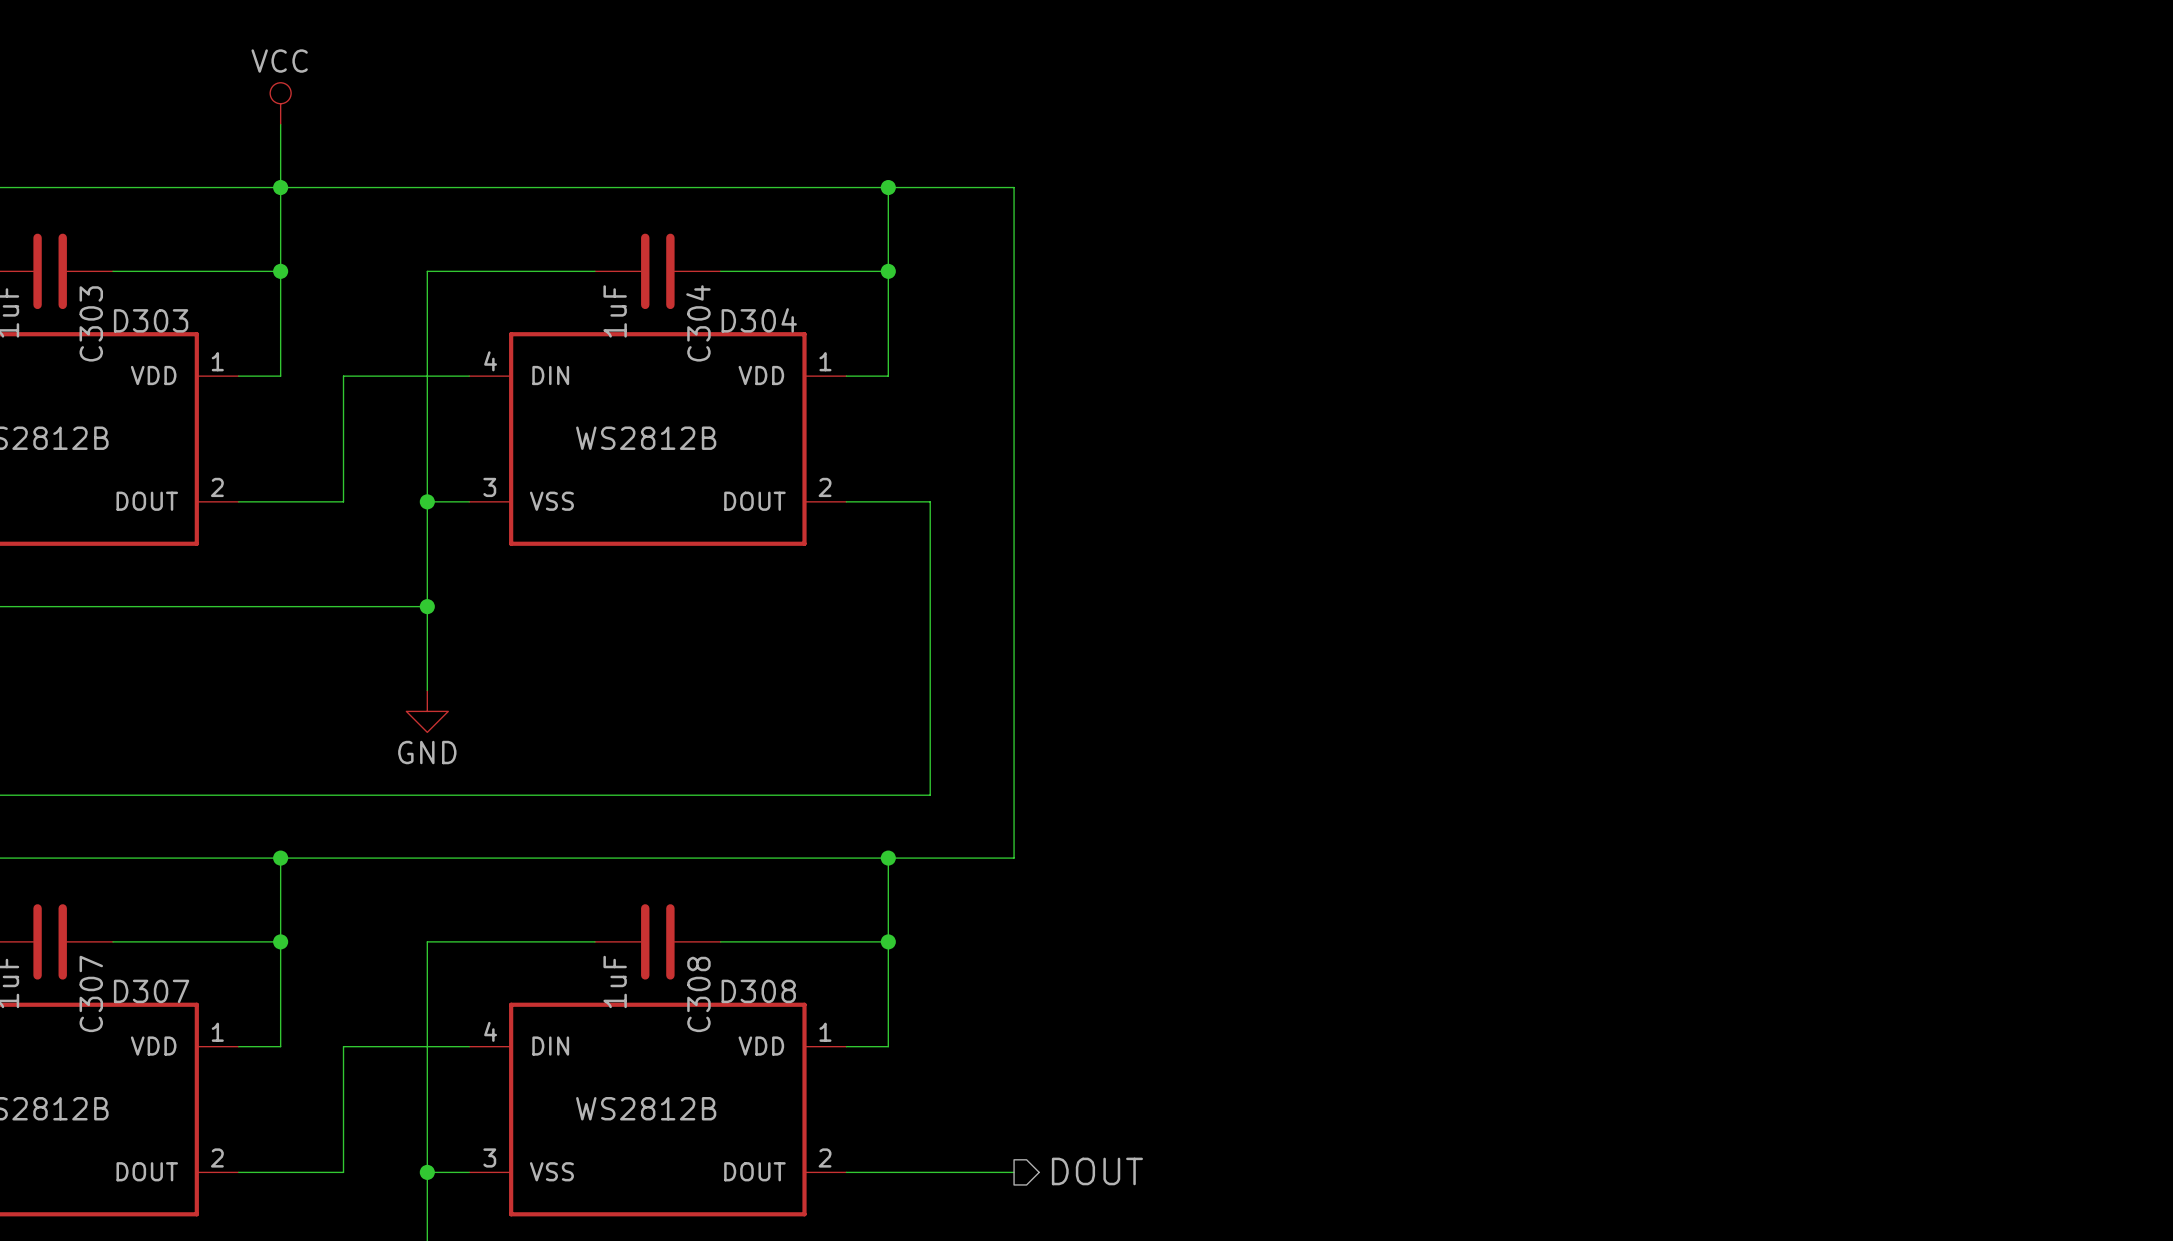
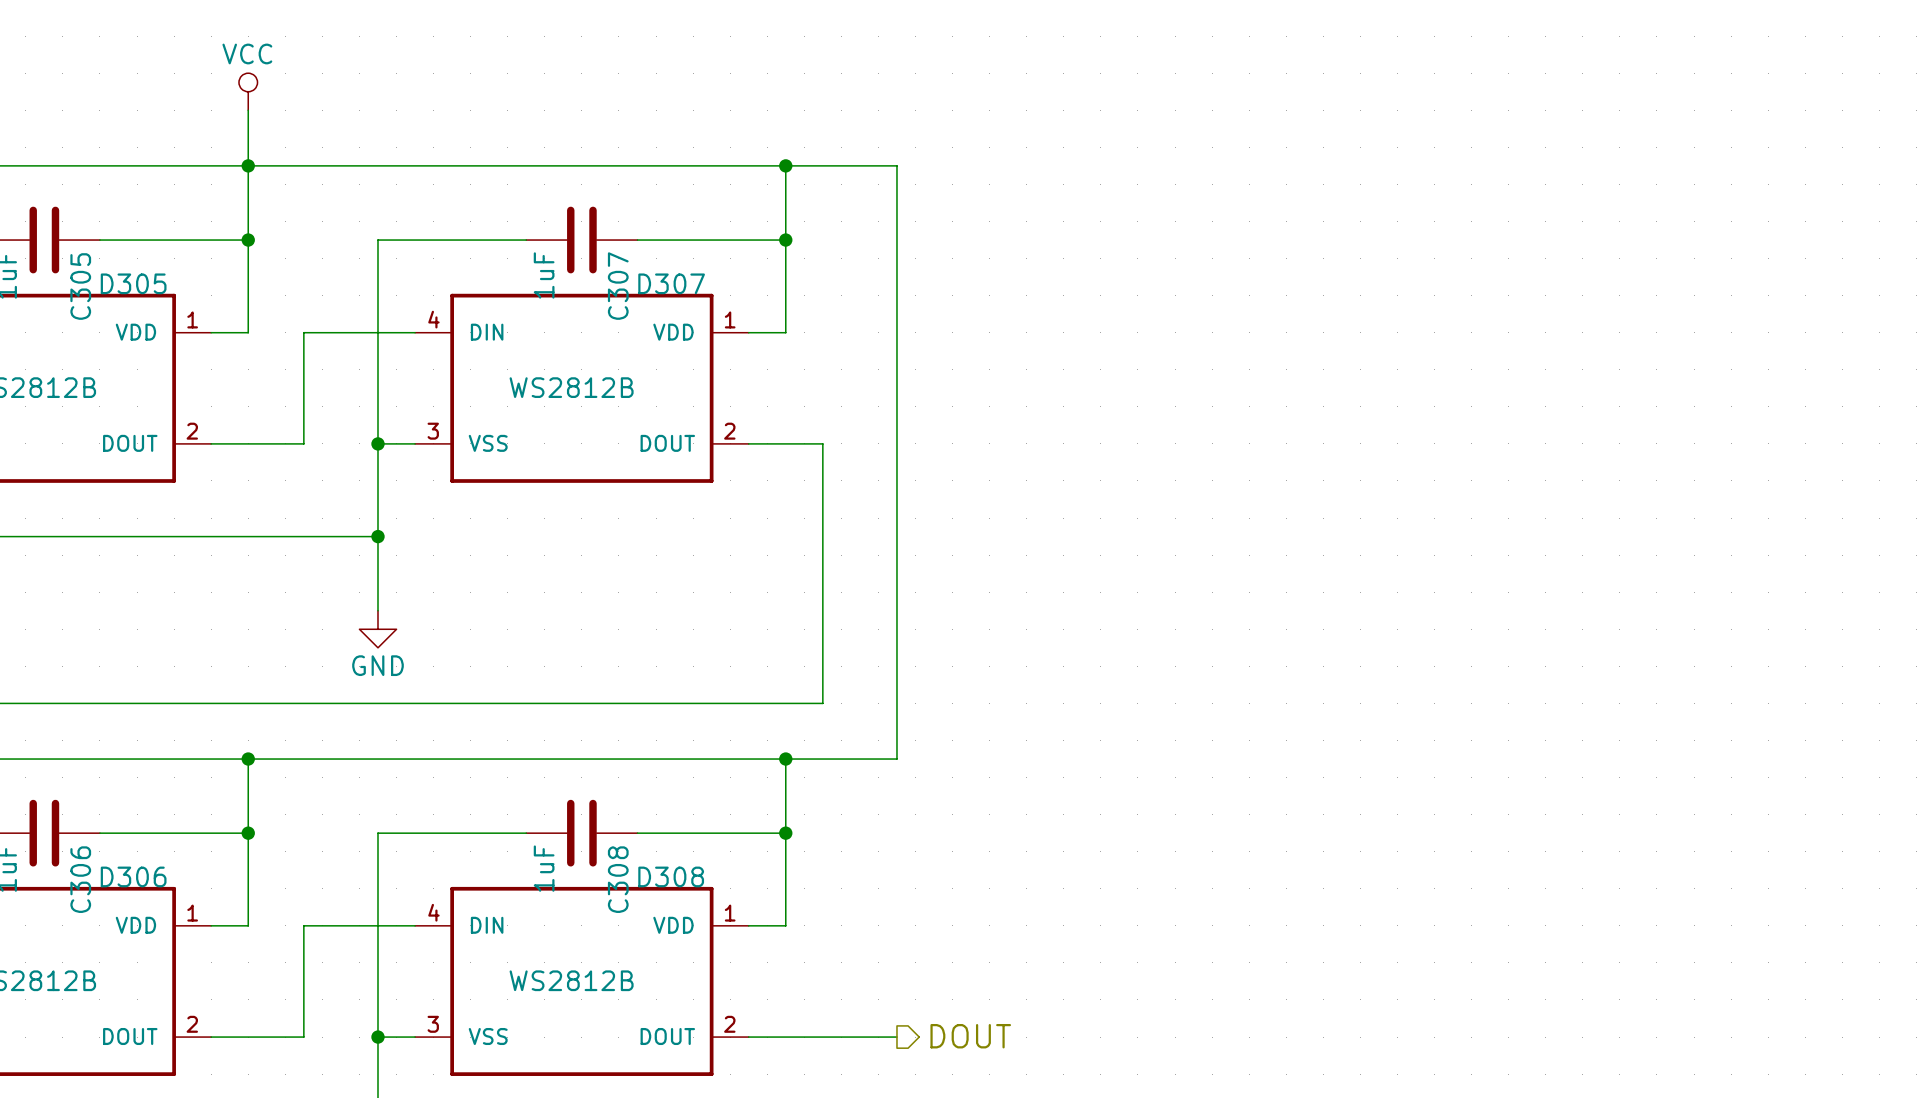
D303 name: D303 (151, 320) -> D305 (133, 283)
D304 name: D304 (759, 320) -> D307 (671, 283)
C303 name: C303 (91, 323) -> C305 (80, 286)
C304 name: C304 (698, 323) -> C307 (618, 286)
D307 name: D307 (151, 991) -> D306 (133, 876)
C307 name: C307 (91, 993) -> C306 (80, 879)

